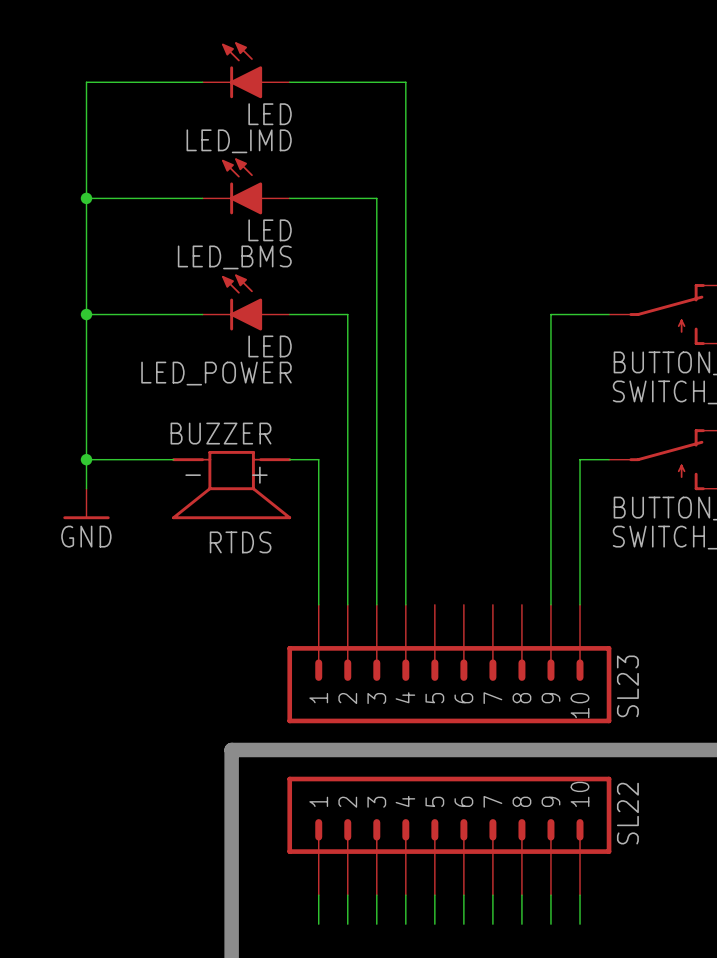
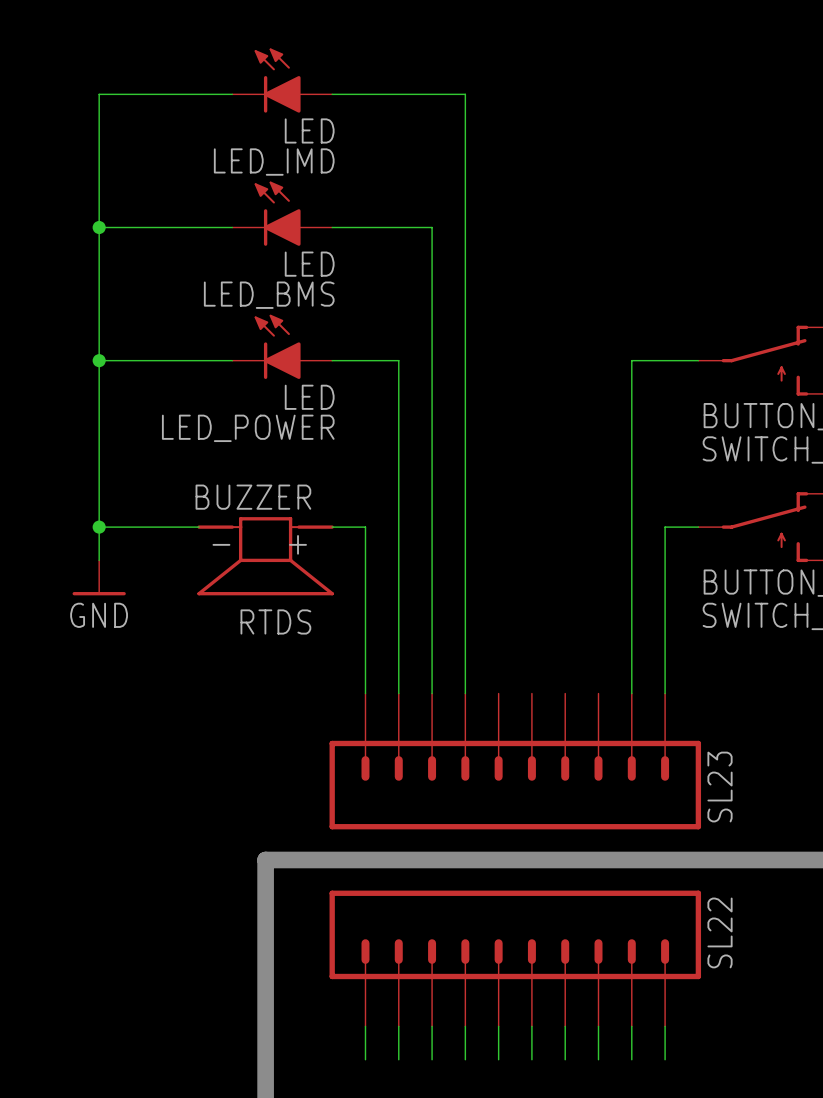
SL23 symbol: [287, 604, 612, 724] -> [329, 693, 702, 830]
SL22 symbol: [287, 776, 612, 896] -> [329, 890, 702, 1027]

